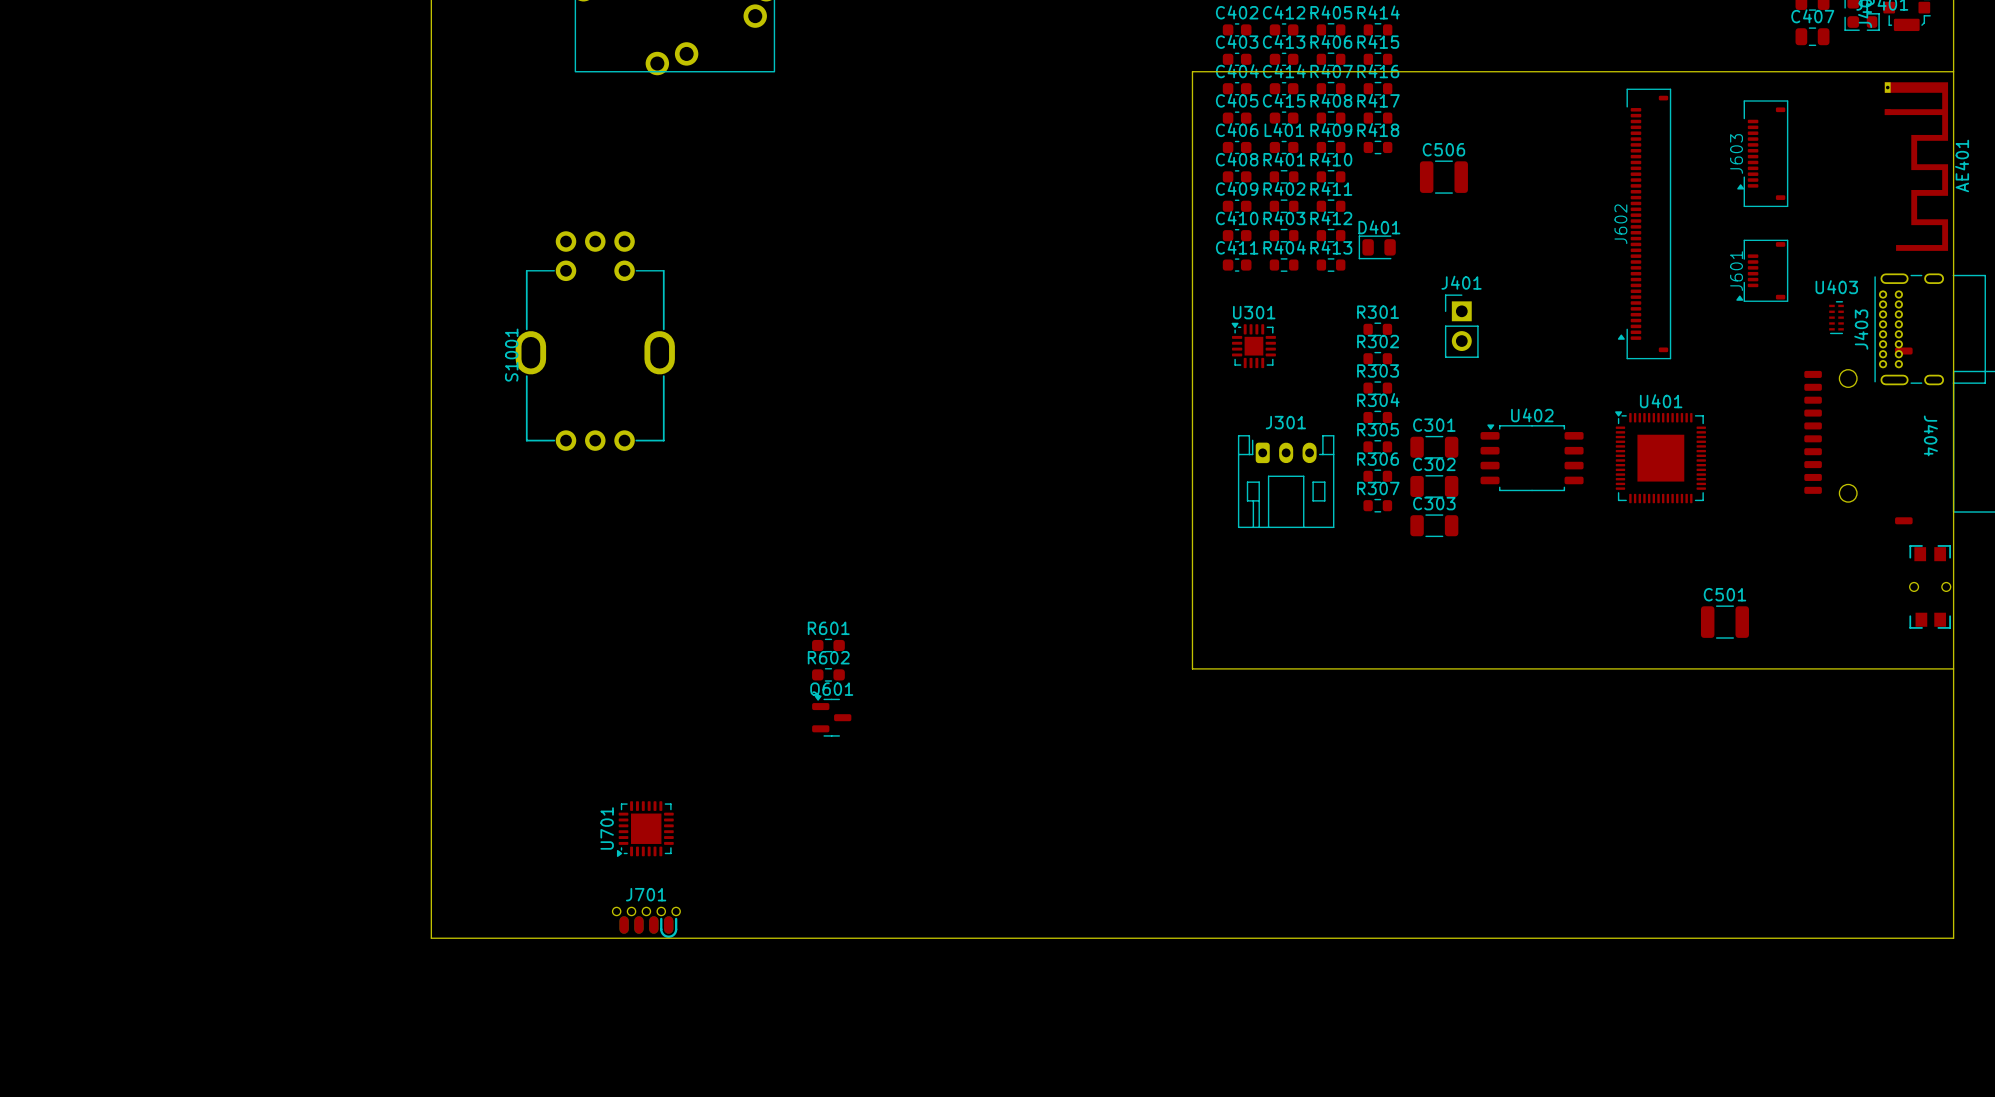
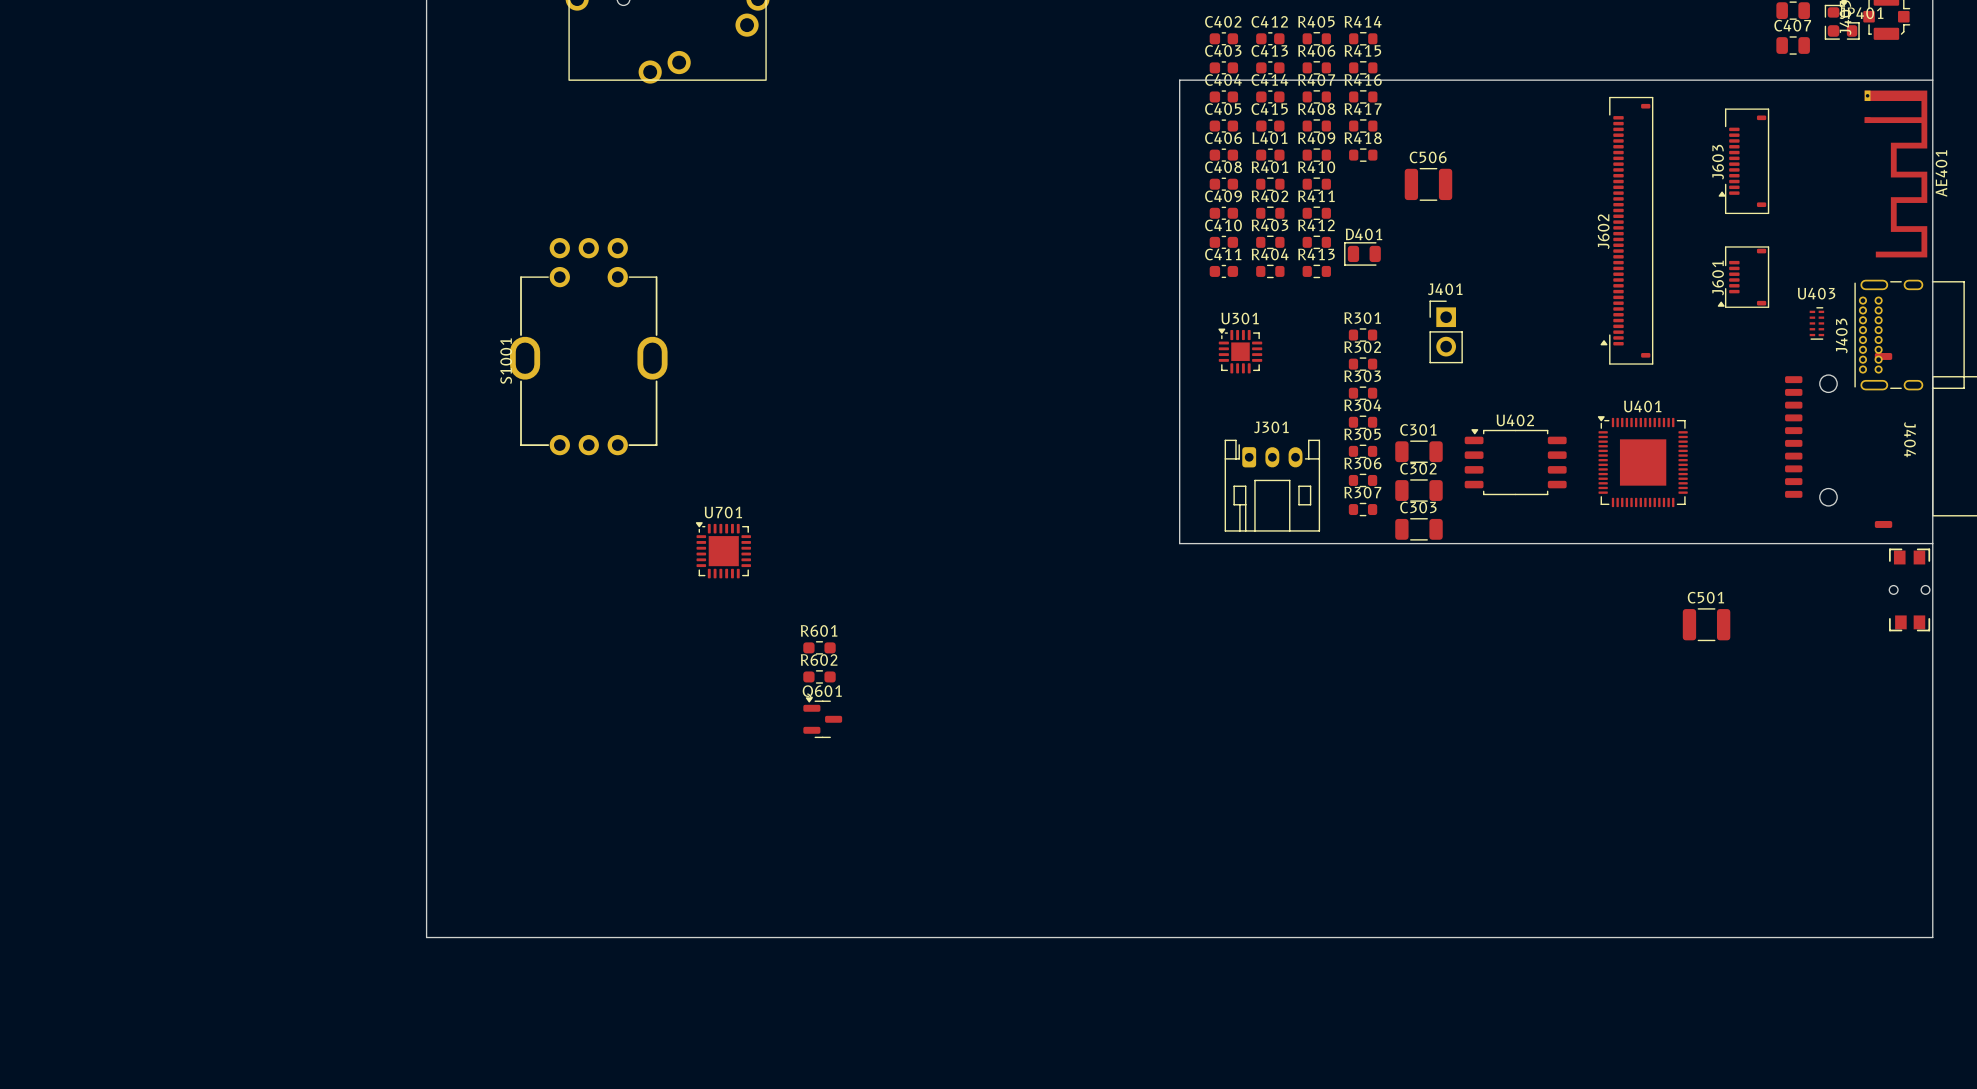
board edge: (1192, 540) (1192, 668) (1953, 668) -> (1179, 543) (1932, 543)
U701 rotation: 0° (645, 829) -> 90° clockwise (723, 550)
U701 position: (645, 829) -> (723, 550)
J701: (646, 922) -> none

